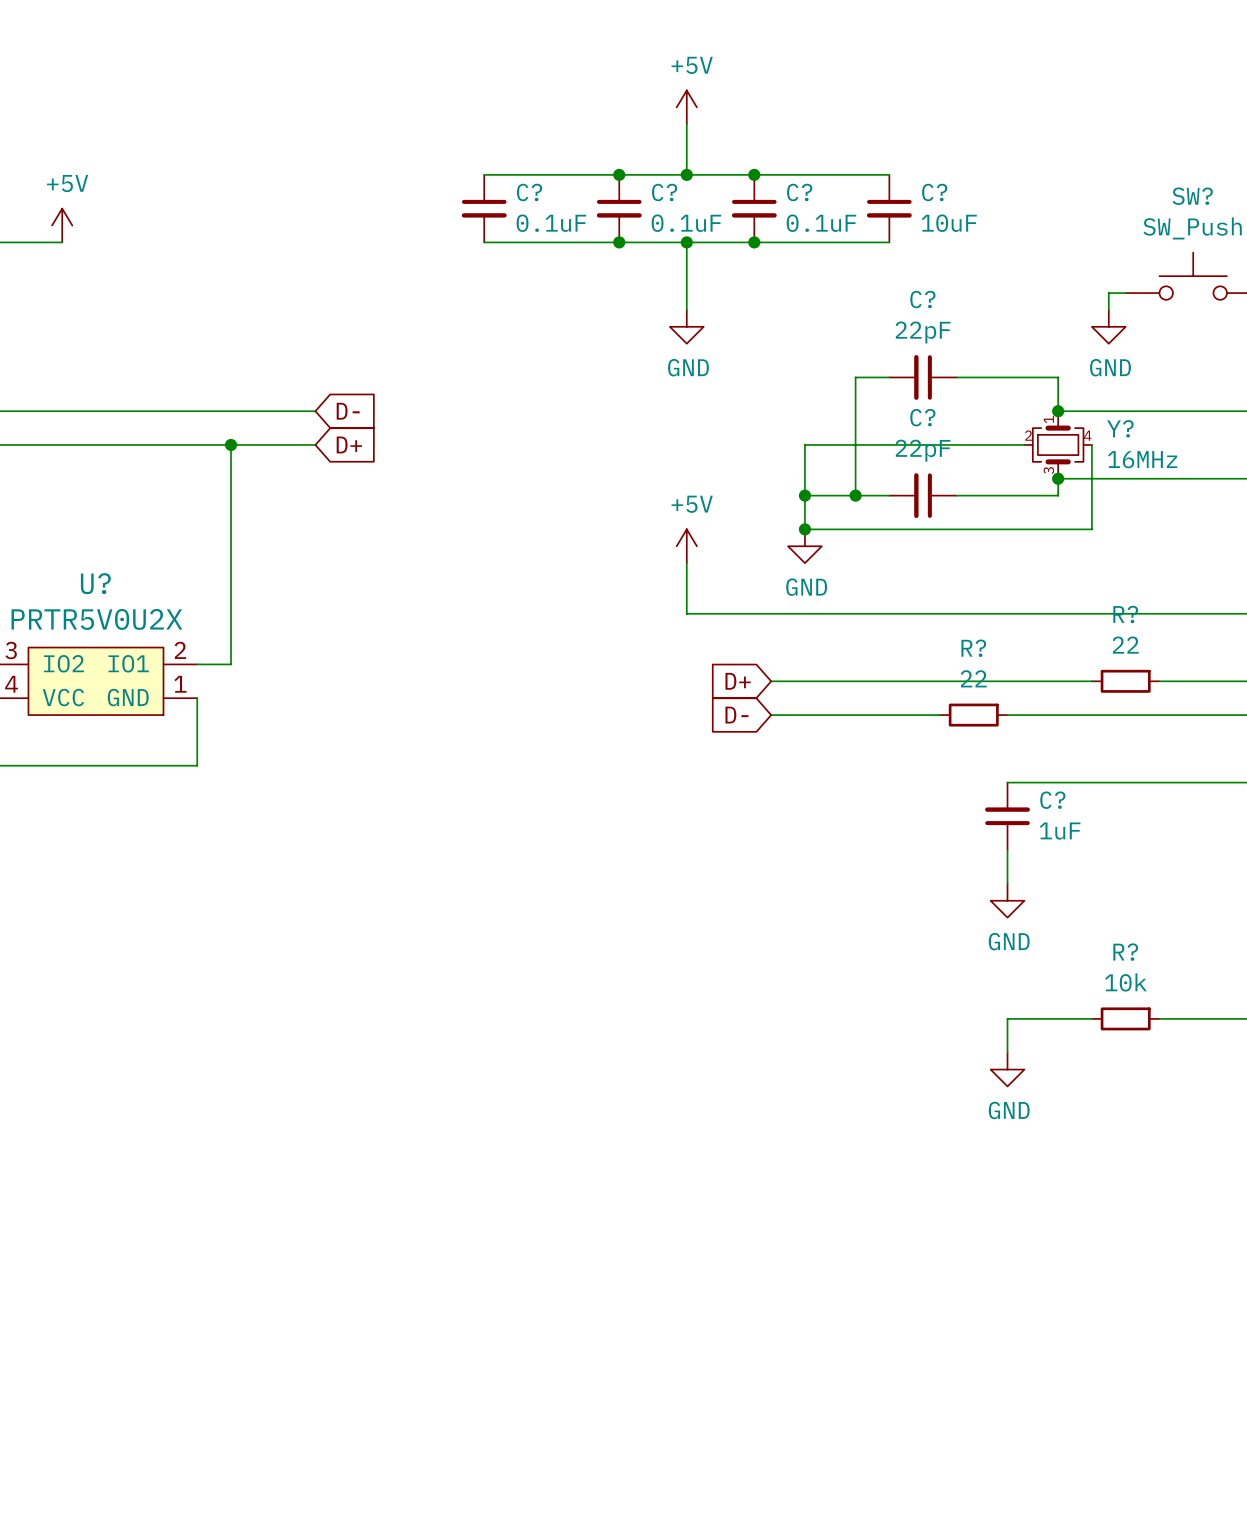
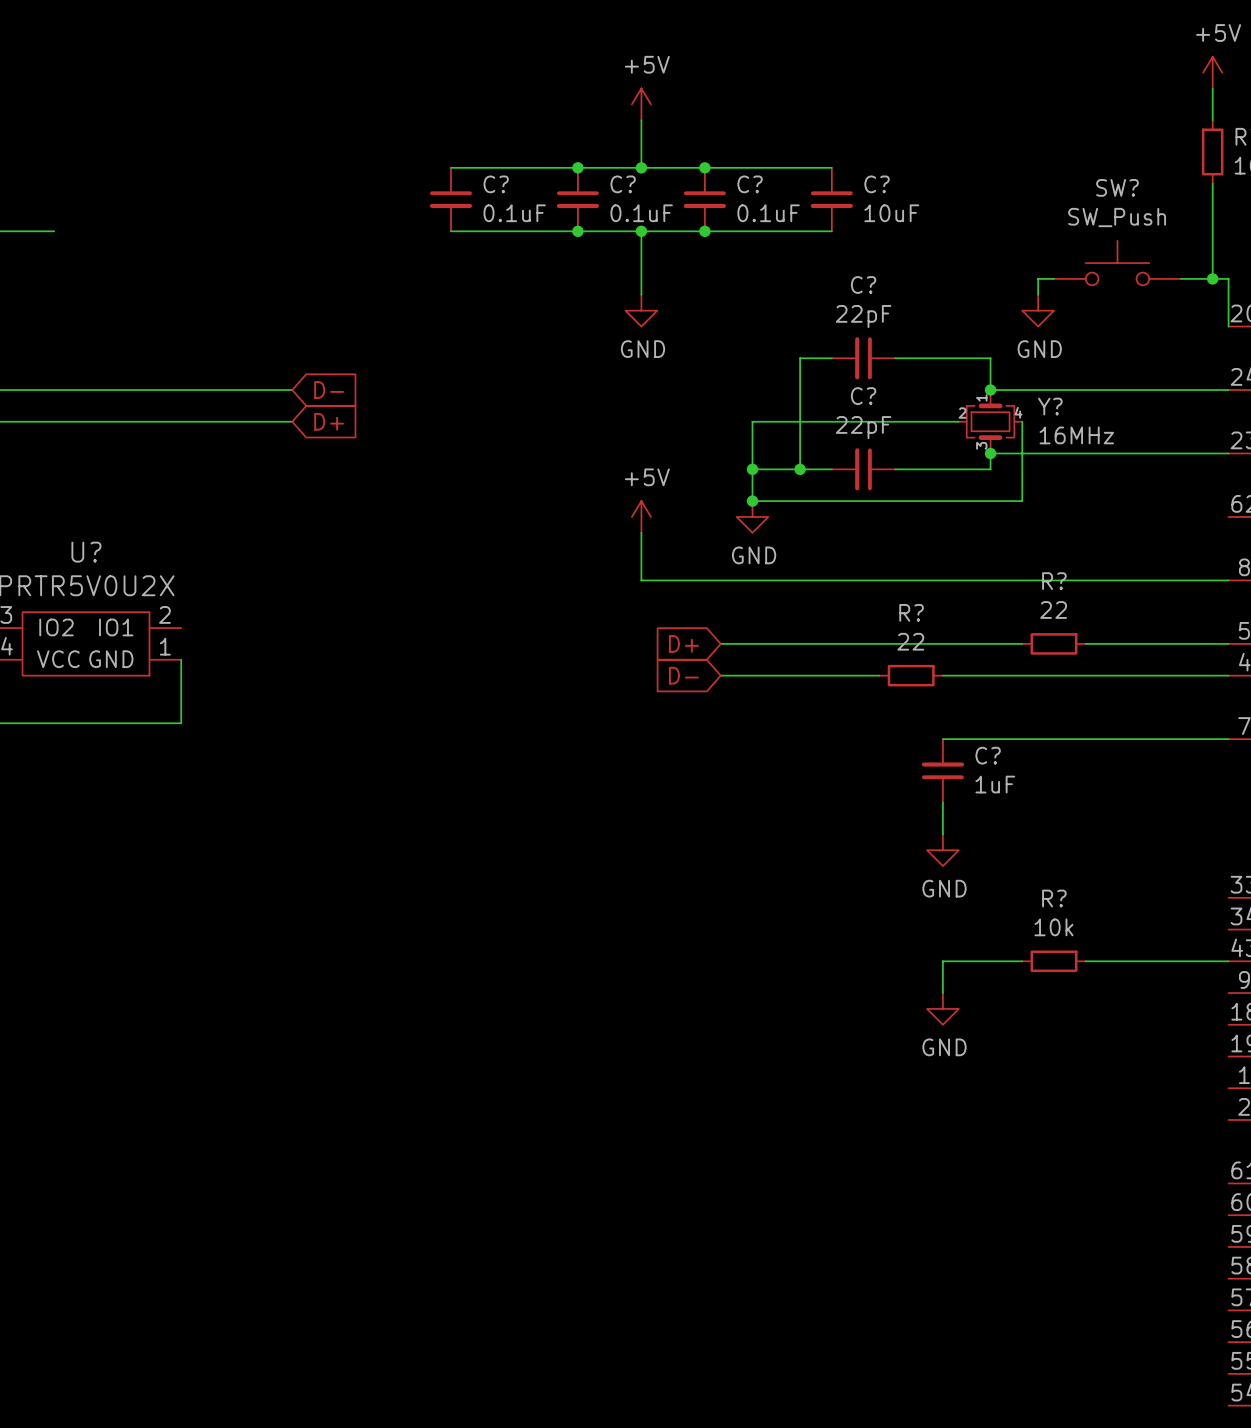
power symbol: +5V (62, 225) -> none
wire: (231, 444) (231, 664) (197, 664) -> none
junction: (231, 444) -> none

